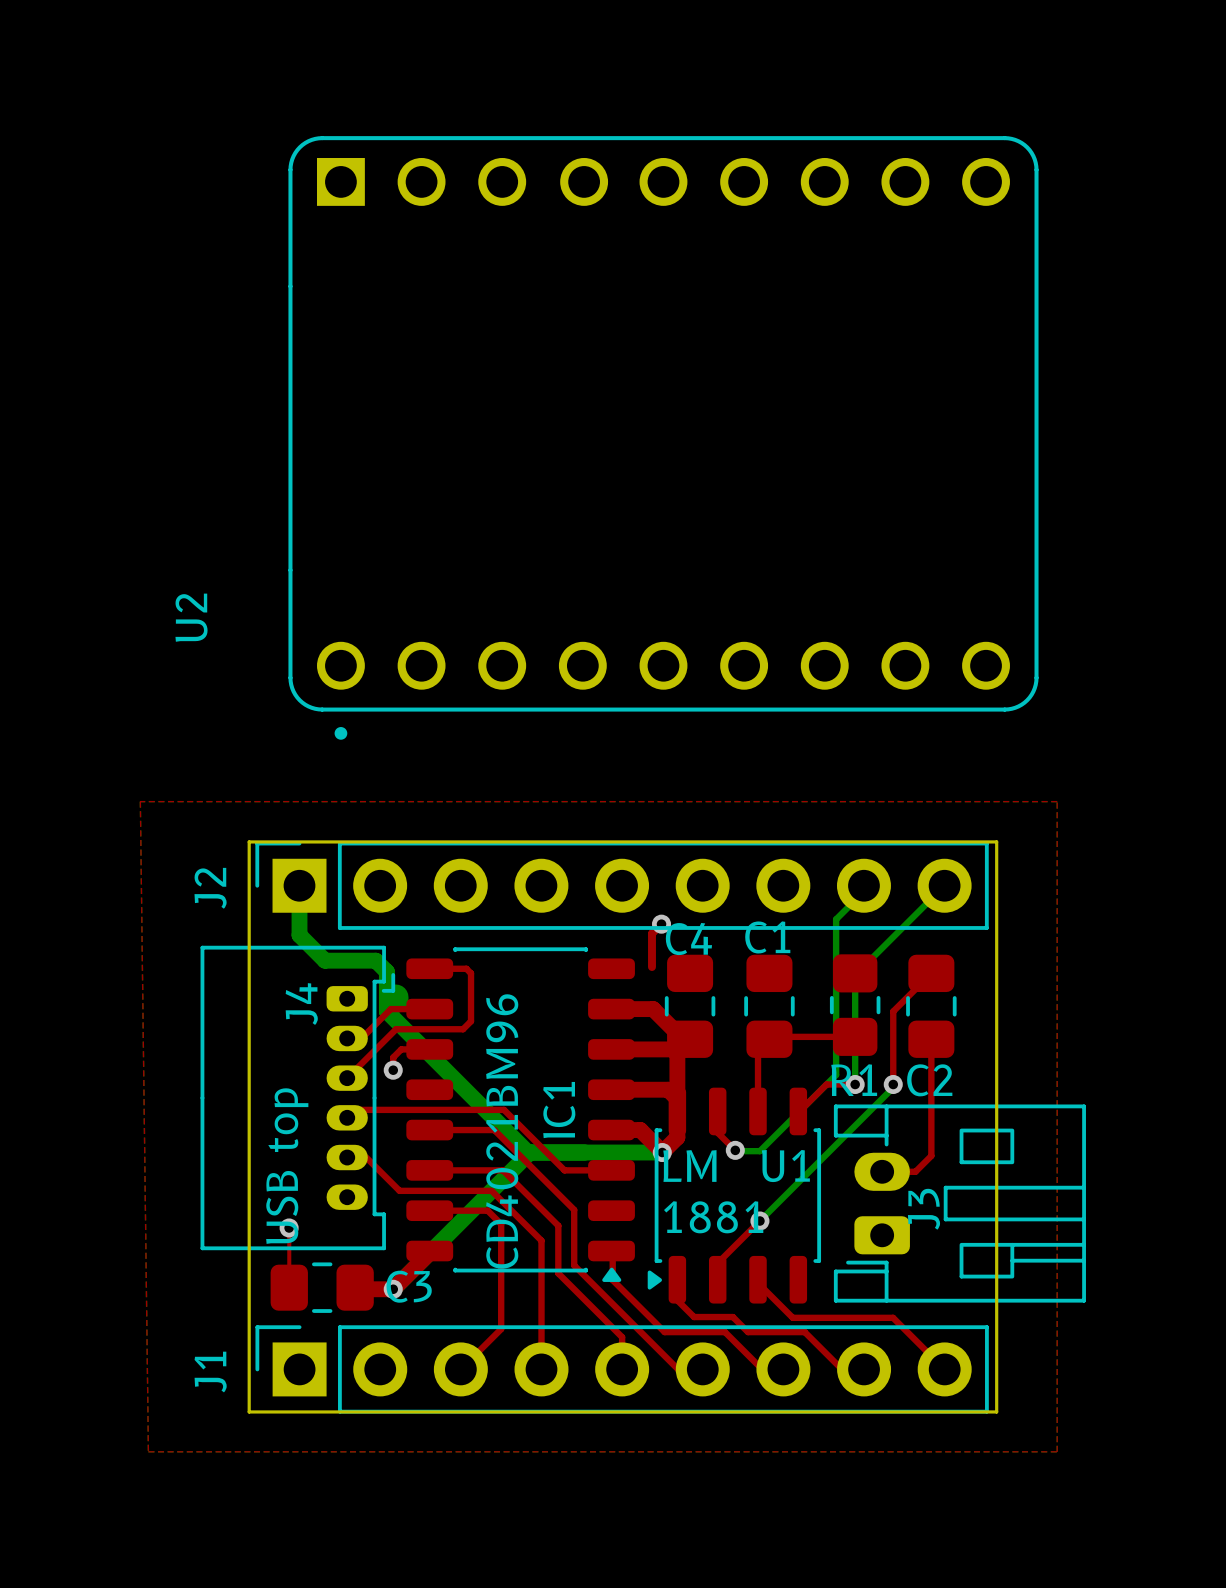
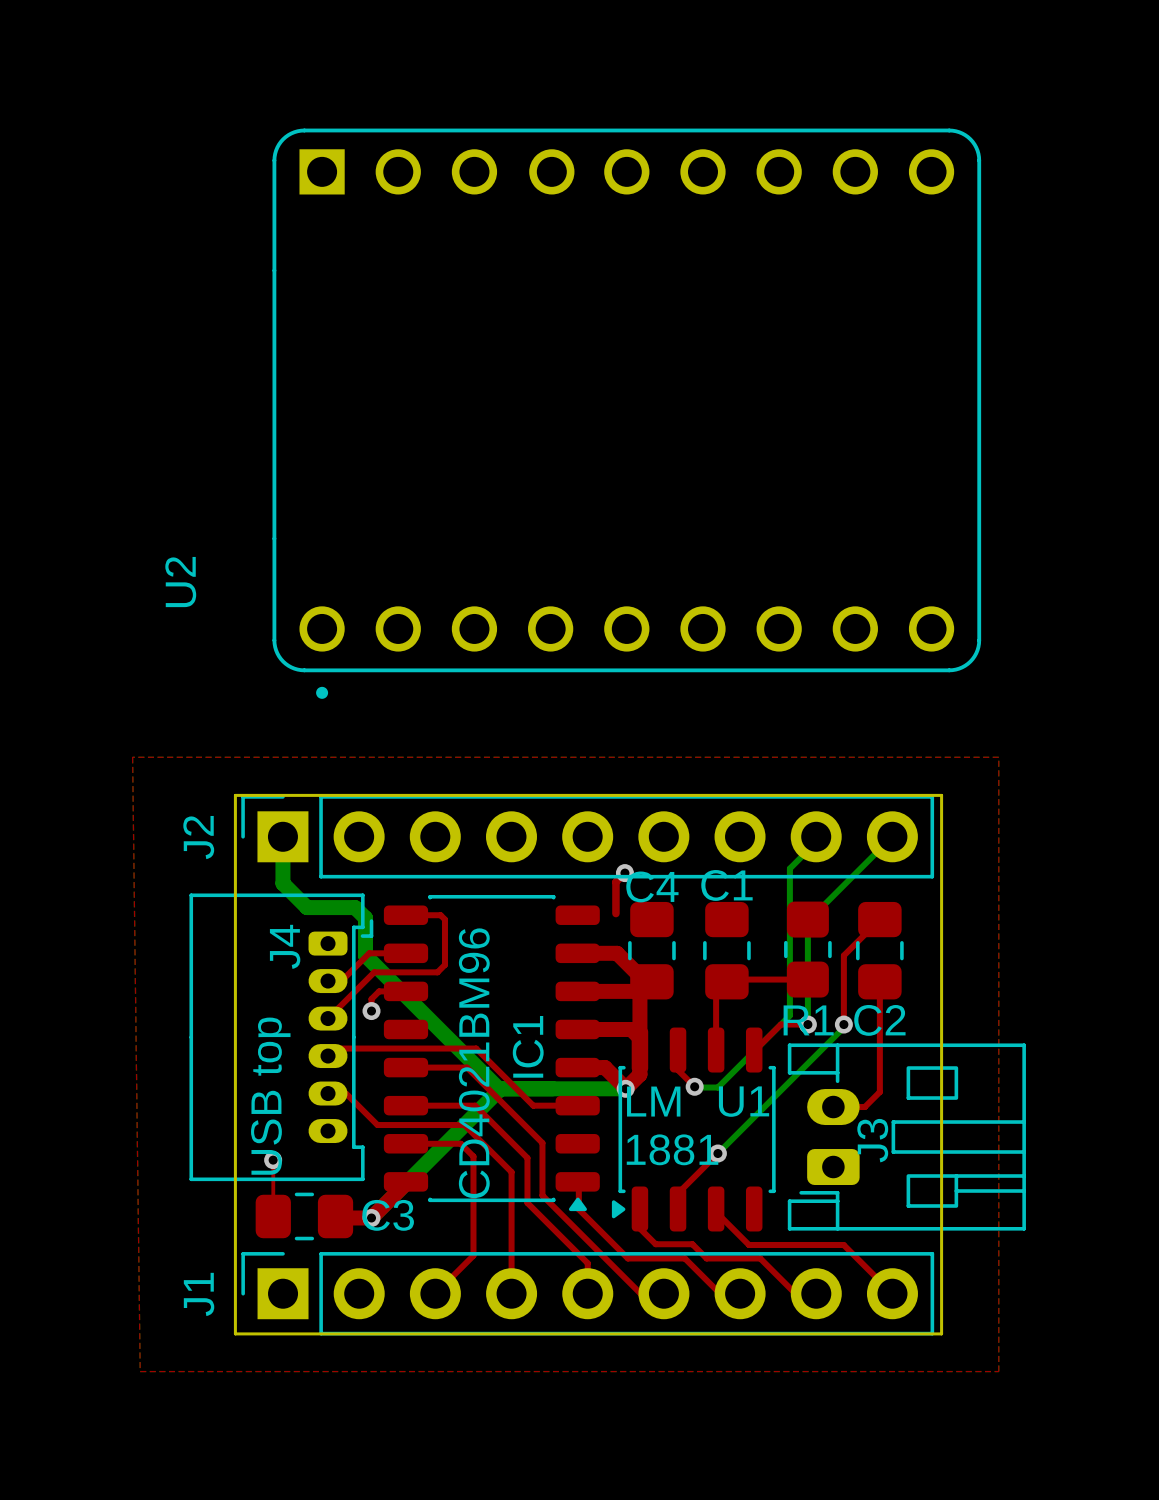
bottom track: (395, 997) (395, 1000) -> none

